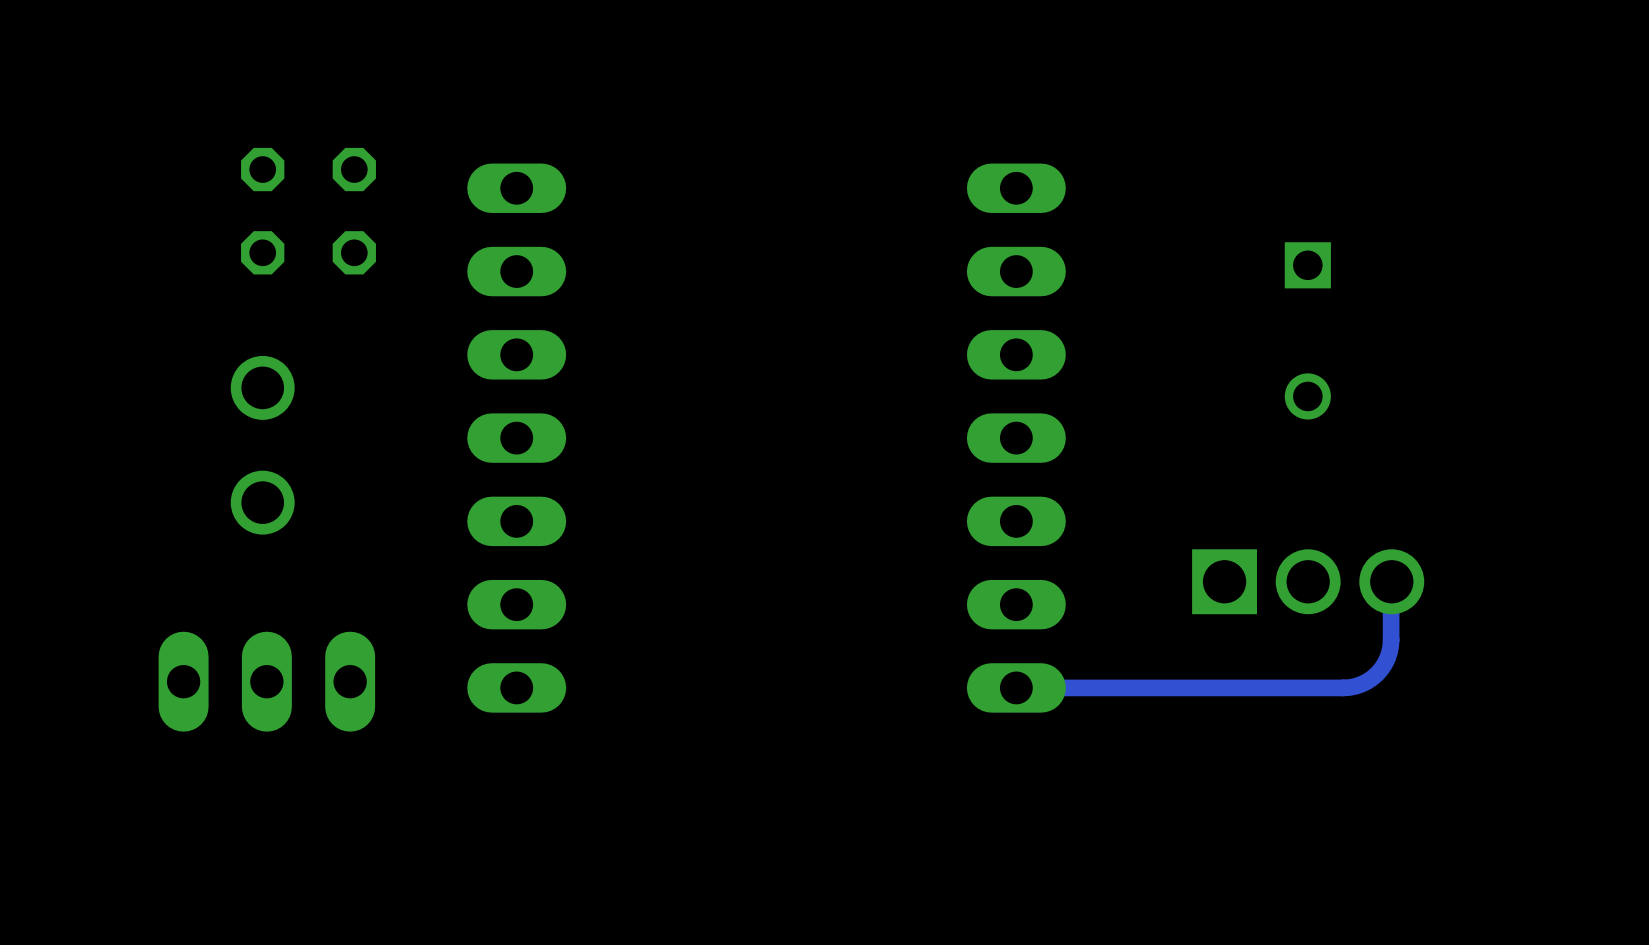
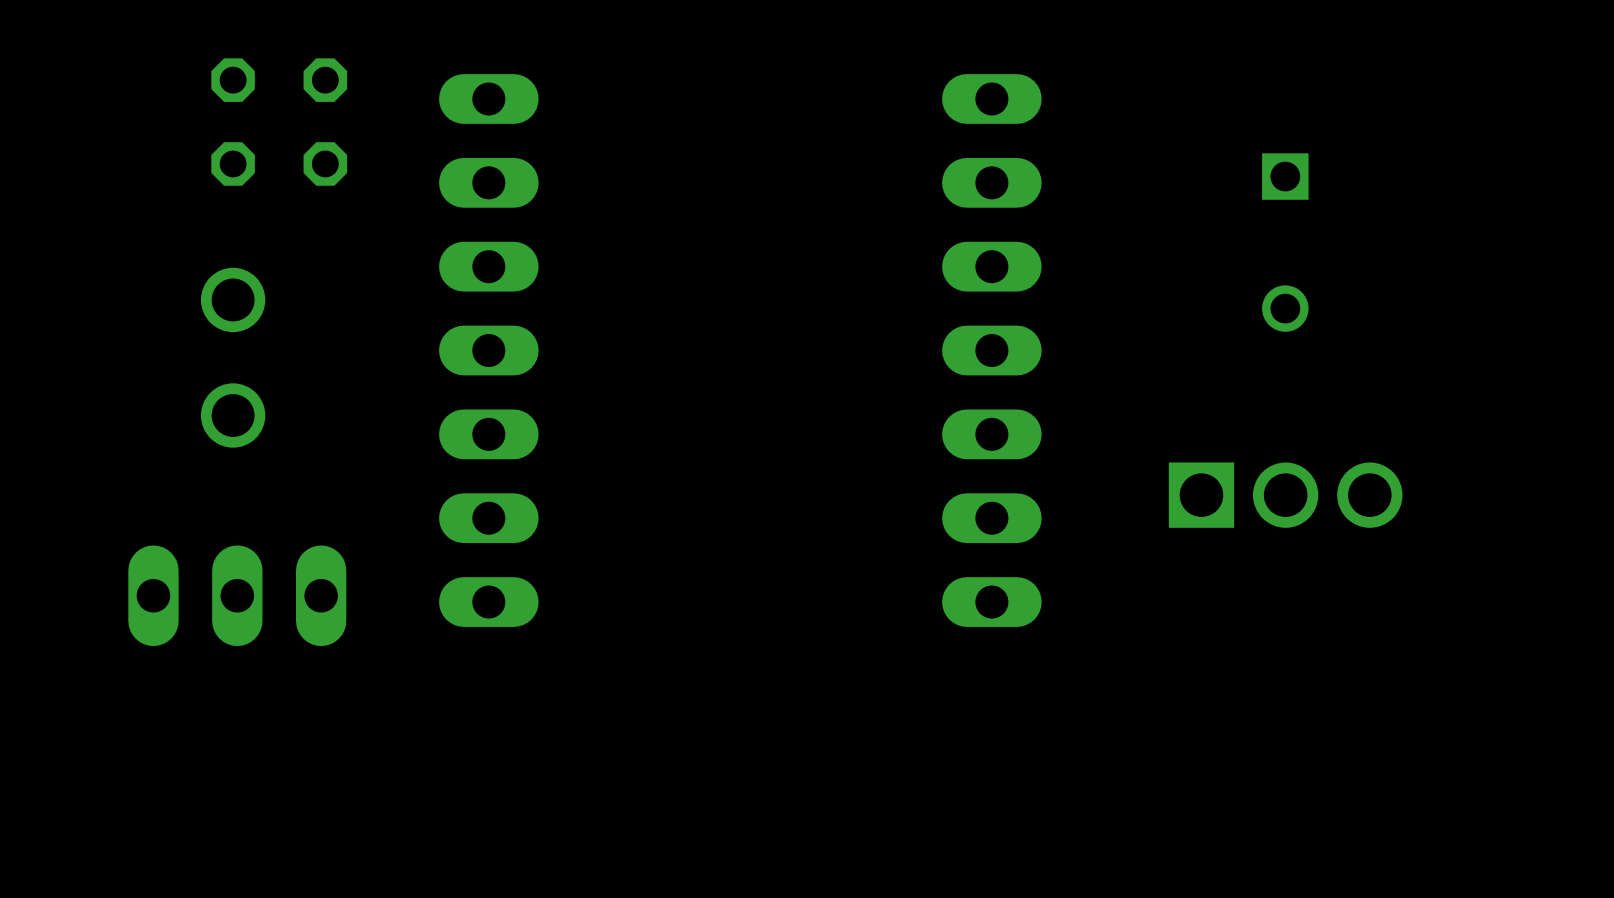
track: (1391, 581) (1391, 640) (1387, 658) (1381, 669) (1372, 678) (1355, 686) (1343, 687) (1016, 687) -> none

